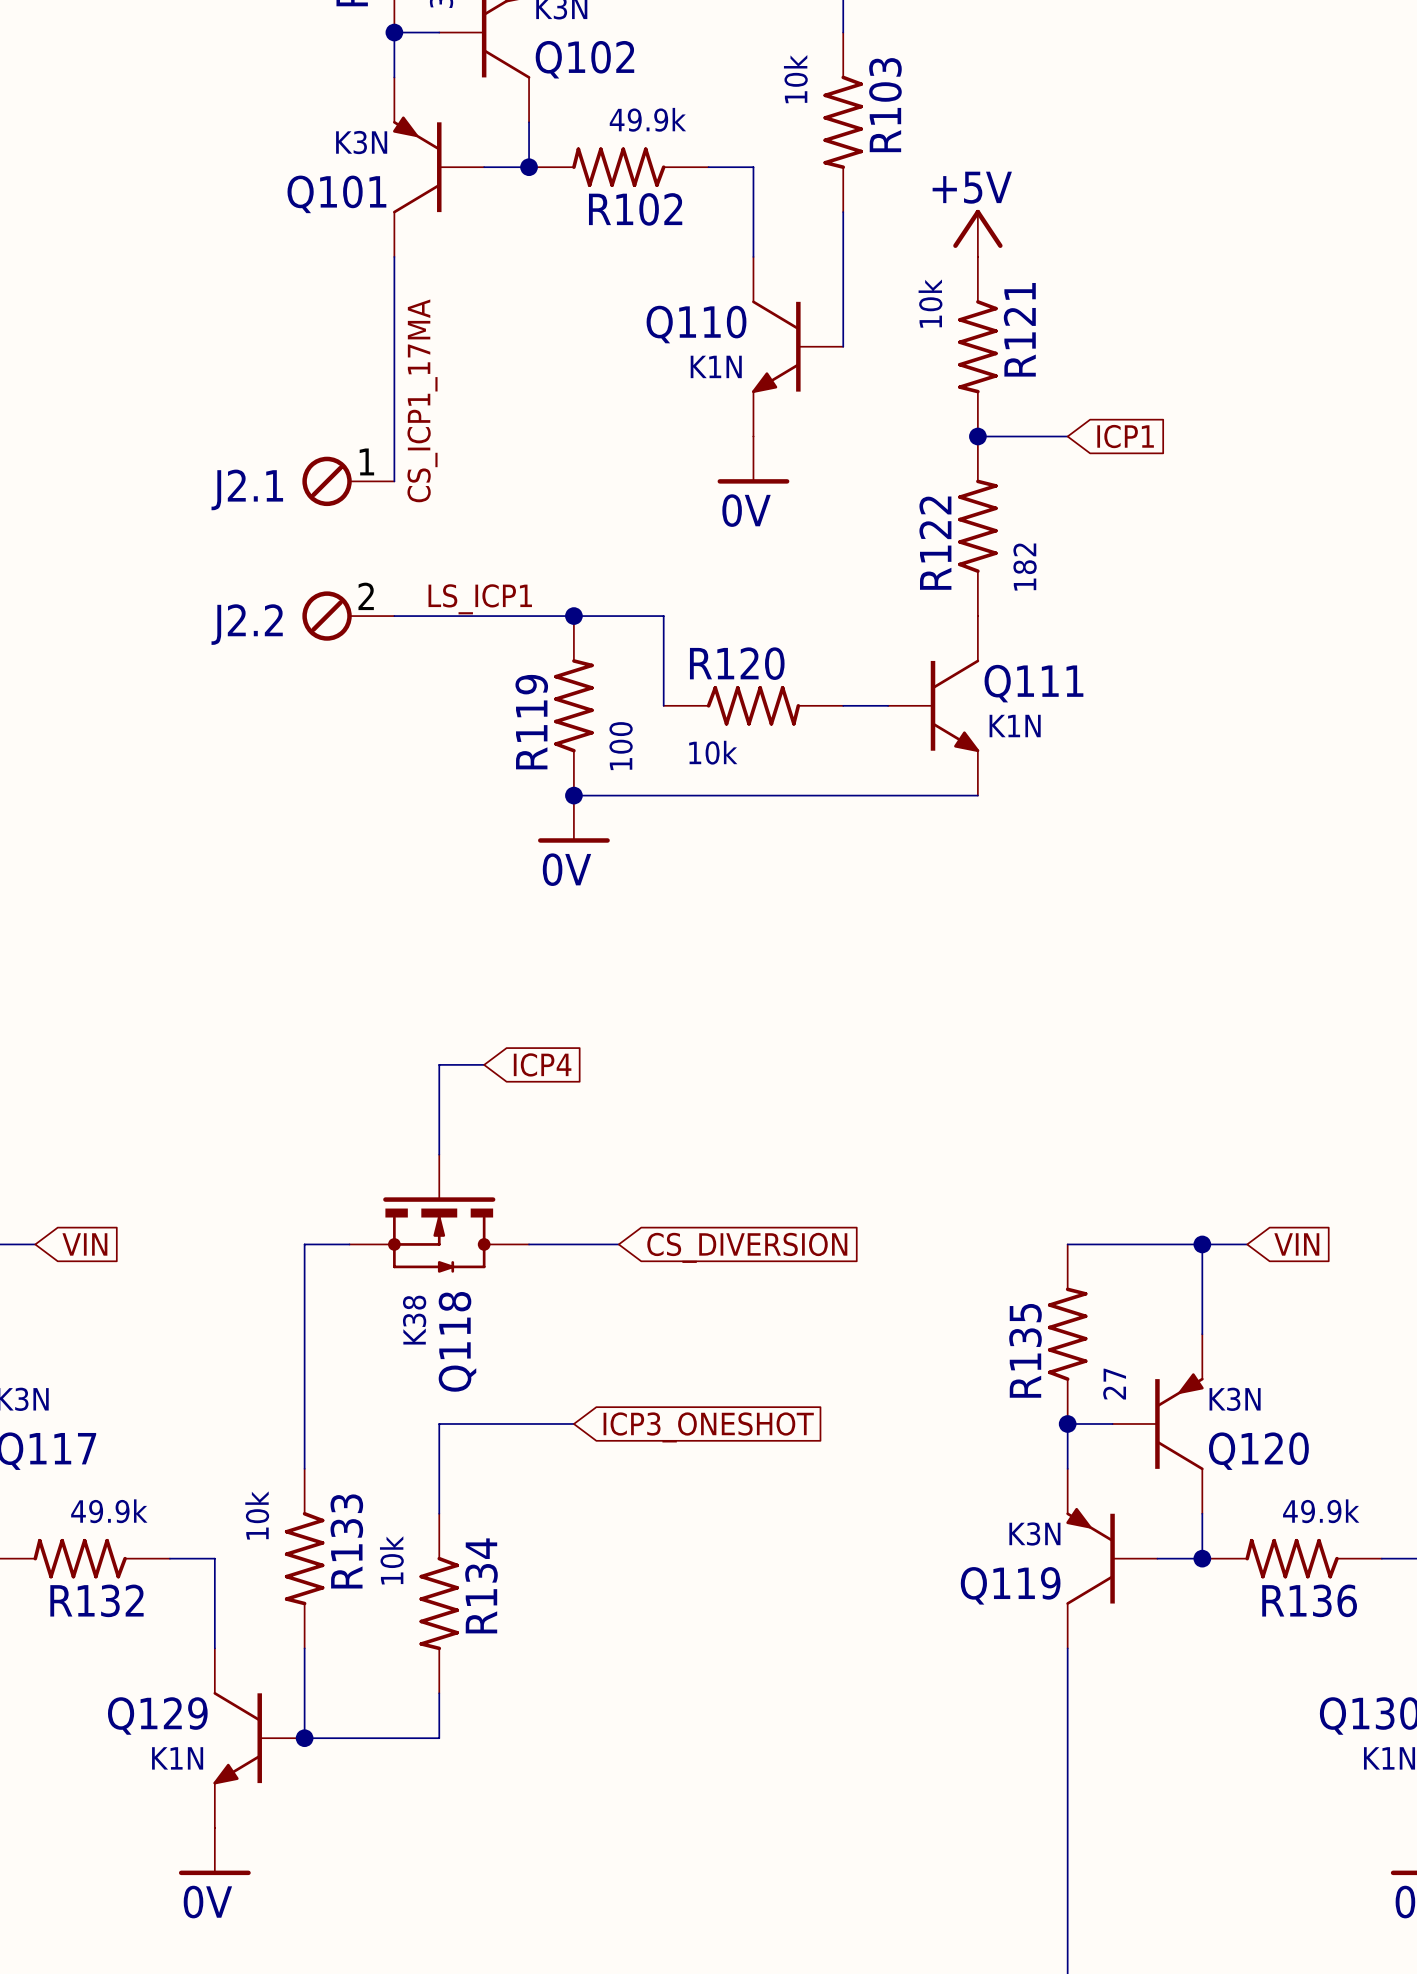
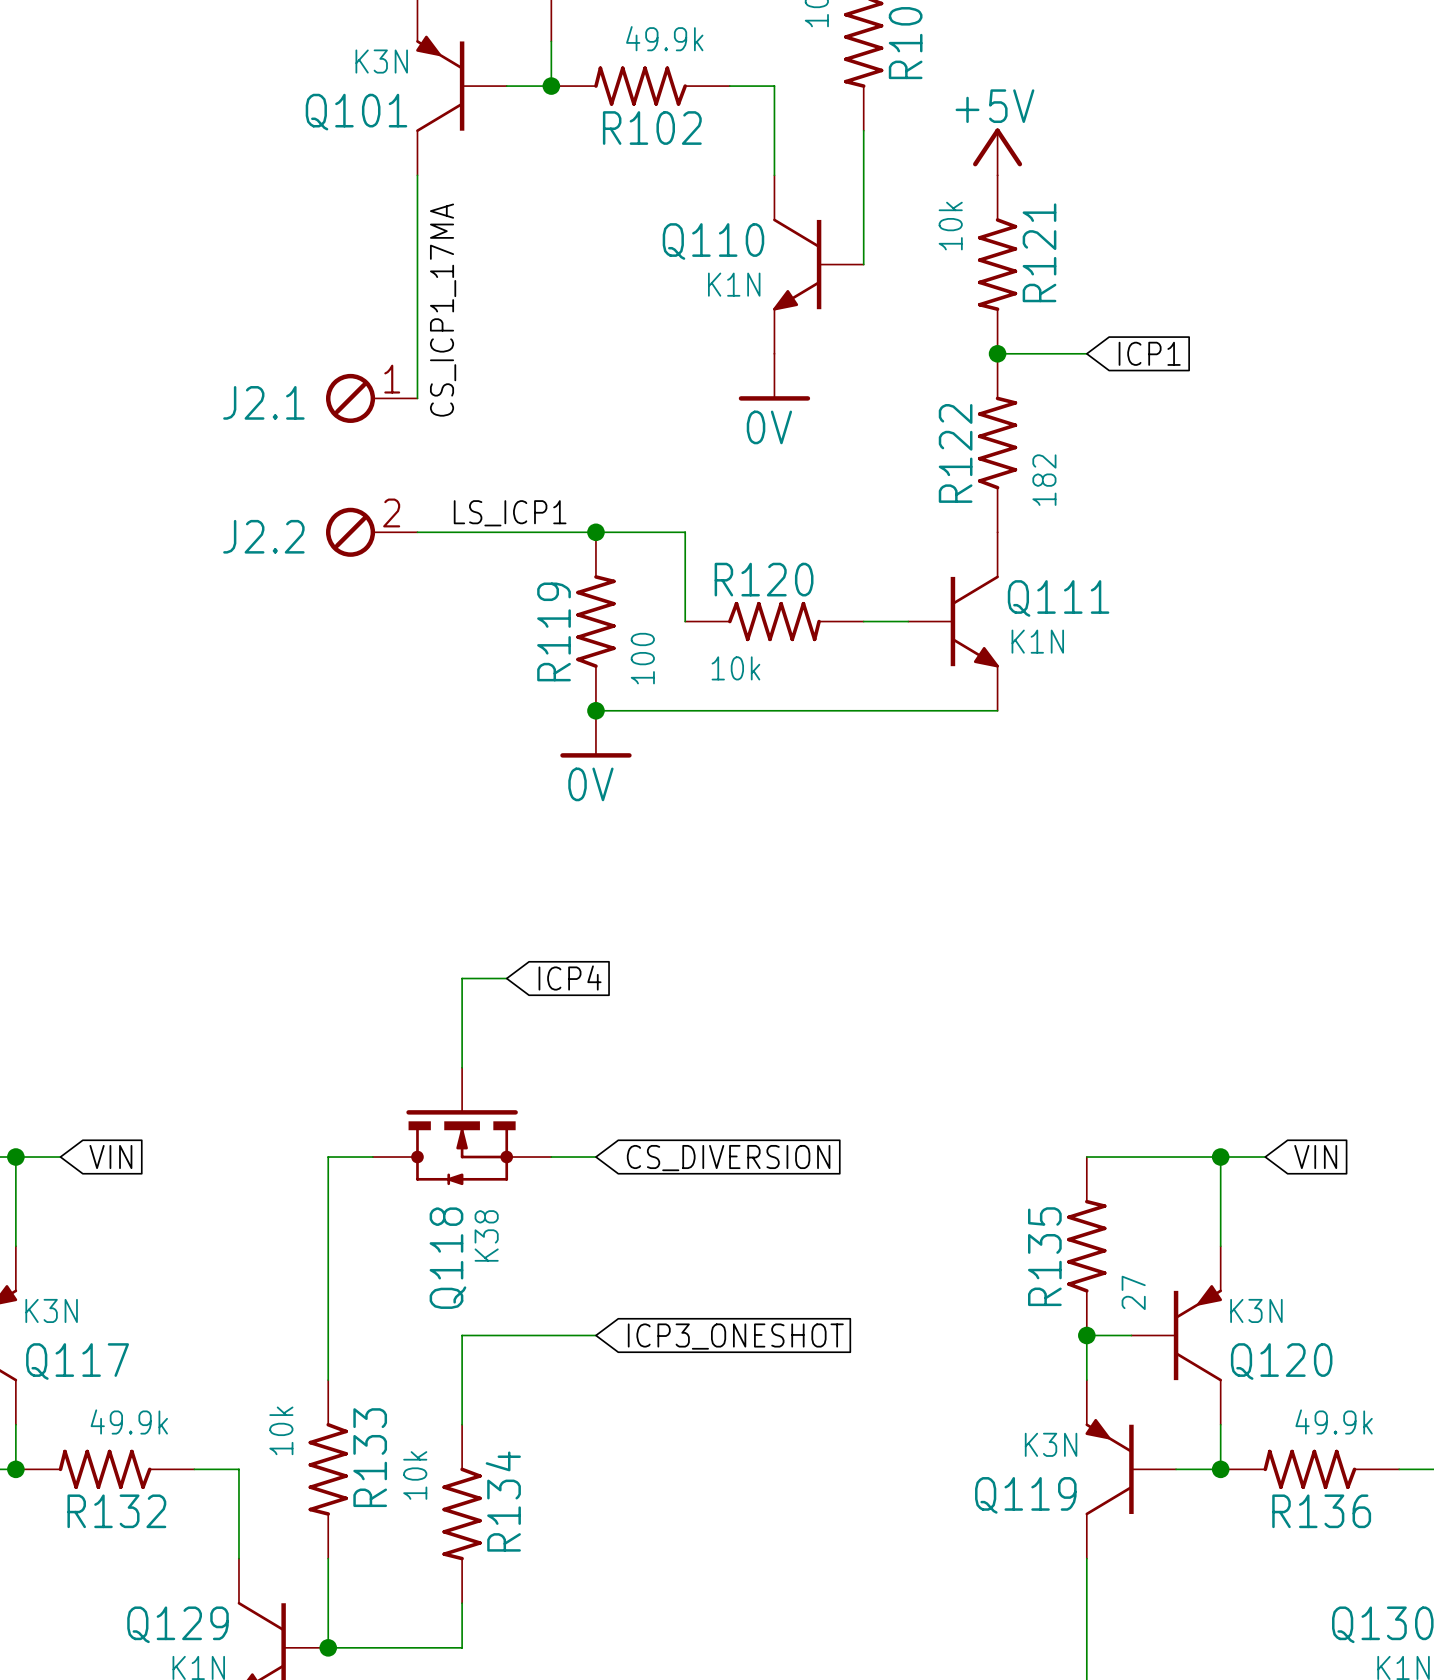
Q118 flip: as is (439, 1235) -> left-right (462, 1147)
wire: (573, 1244) (618, 1244) -> none
global label position: CS_DIVERSION (747, 1247) -> CS_DIVERSION (728, 1158)

